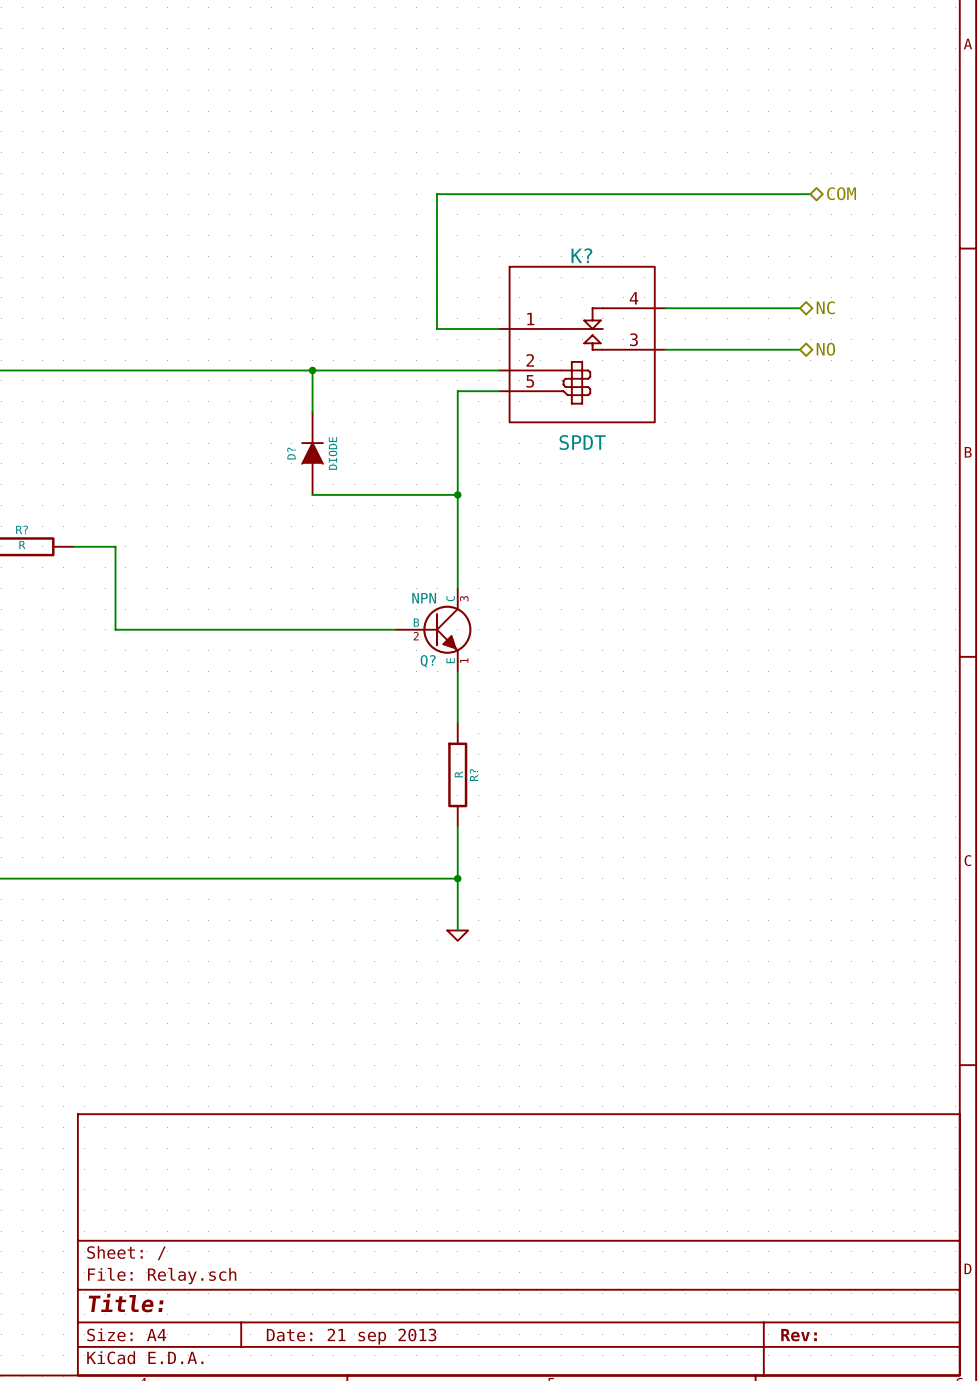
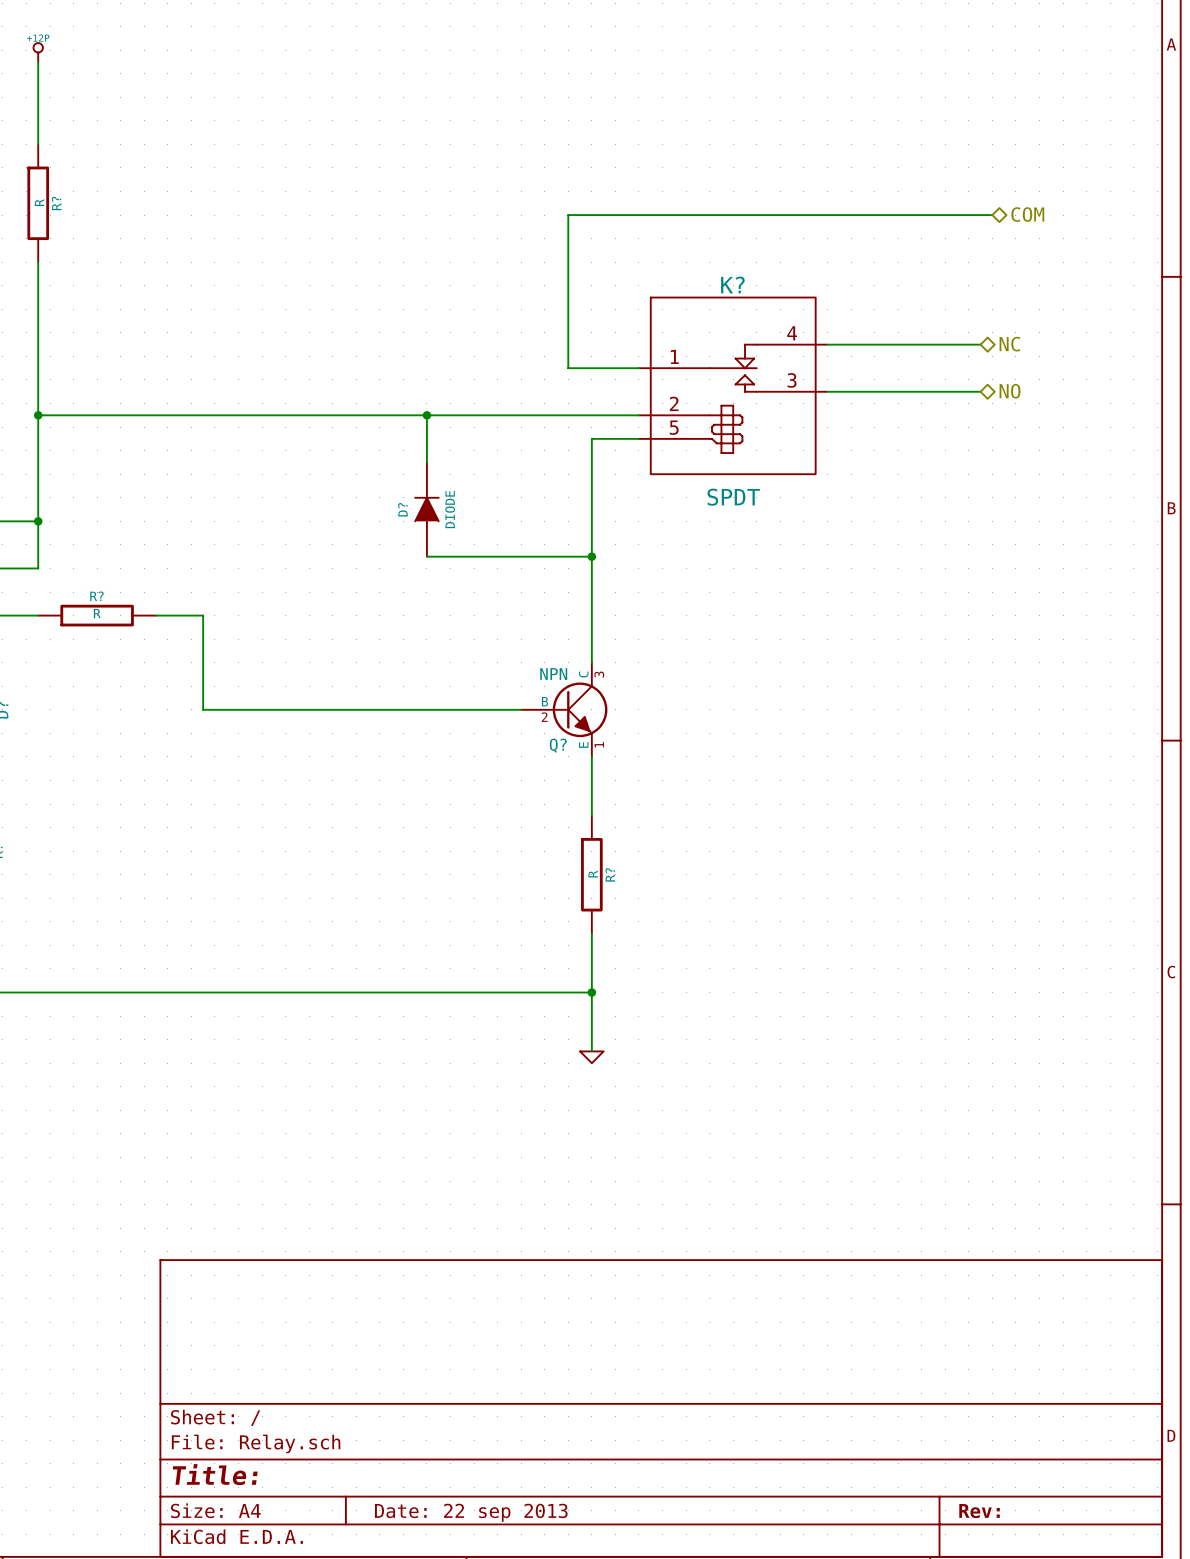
title block: Date: 21 sep 2013 (351, 1336) -> Date: 22 sep 2013 (471, 1512)

